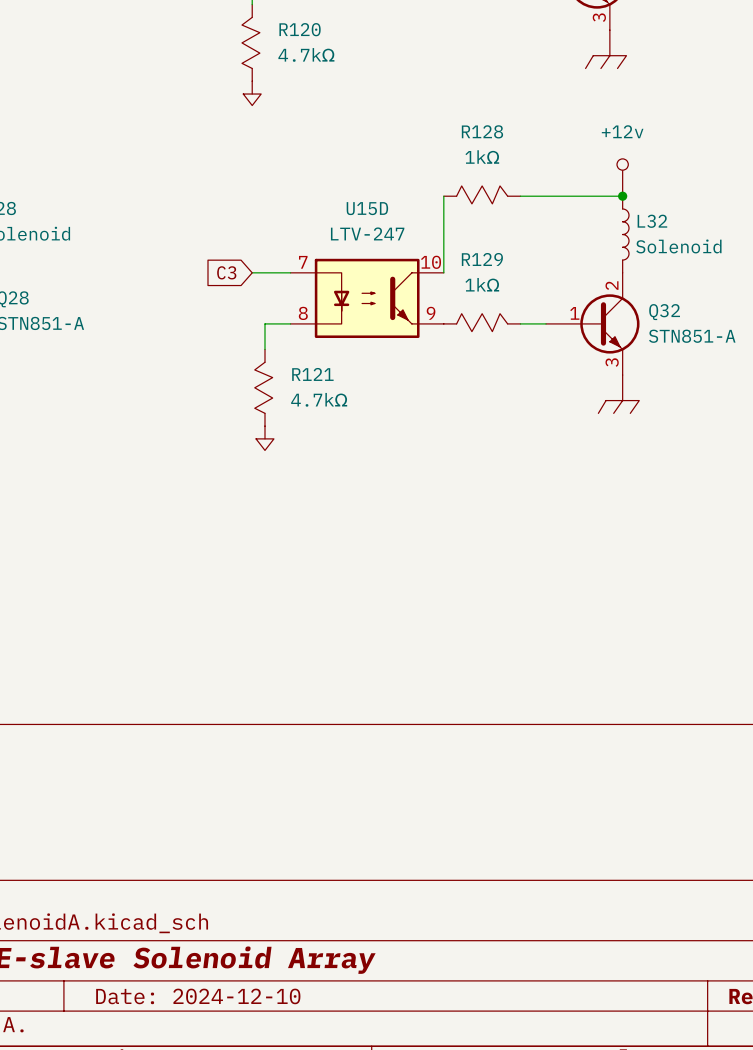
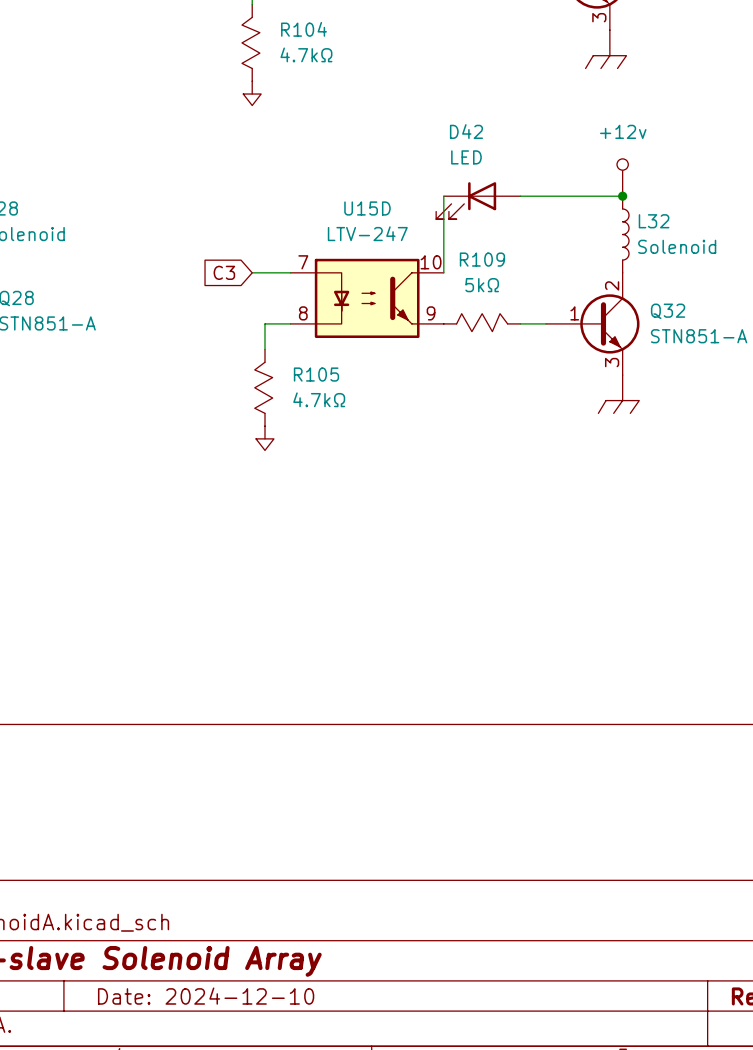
R120 name: R120 (300, 29) -> R104 (304, 29)
R128: 1kΩ (482, 194) -> none
D42: none -> LED (478, 200)
R129 name: R129 (482, 259) -> R109 (482, 259)
R129 value: 1kΩ (482, 284) -> 5kΩ (482, 285)
R121 name: R121 (312, 374) -> R105 (316, 374)

